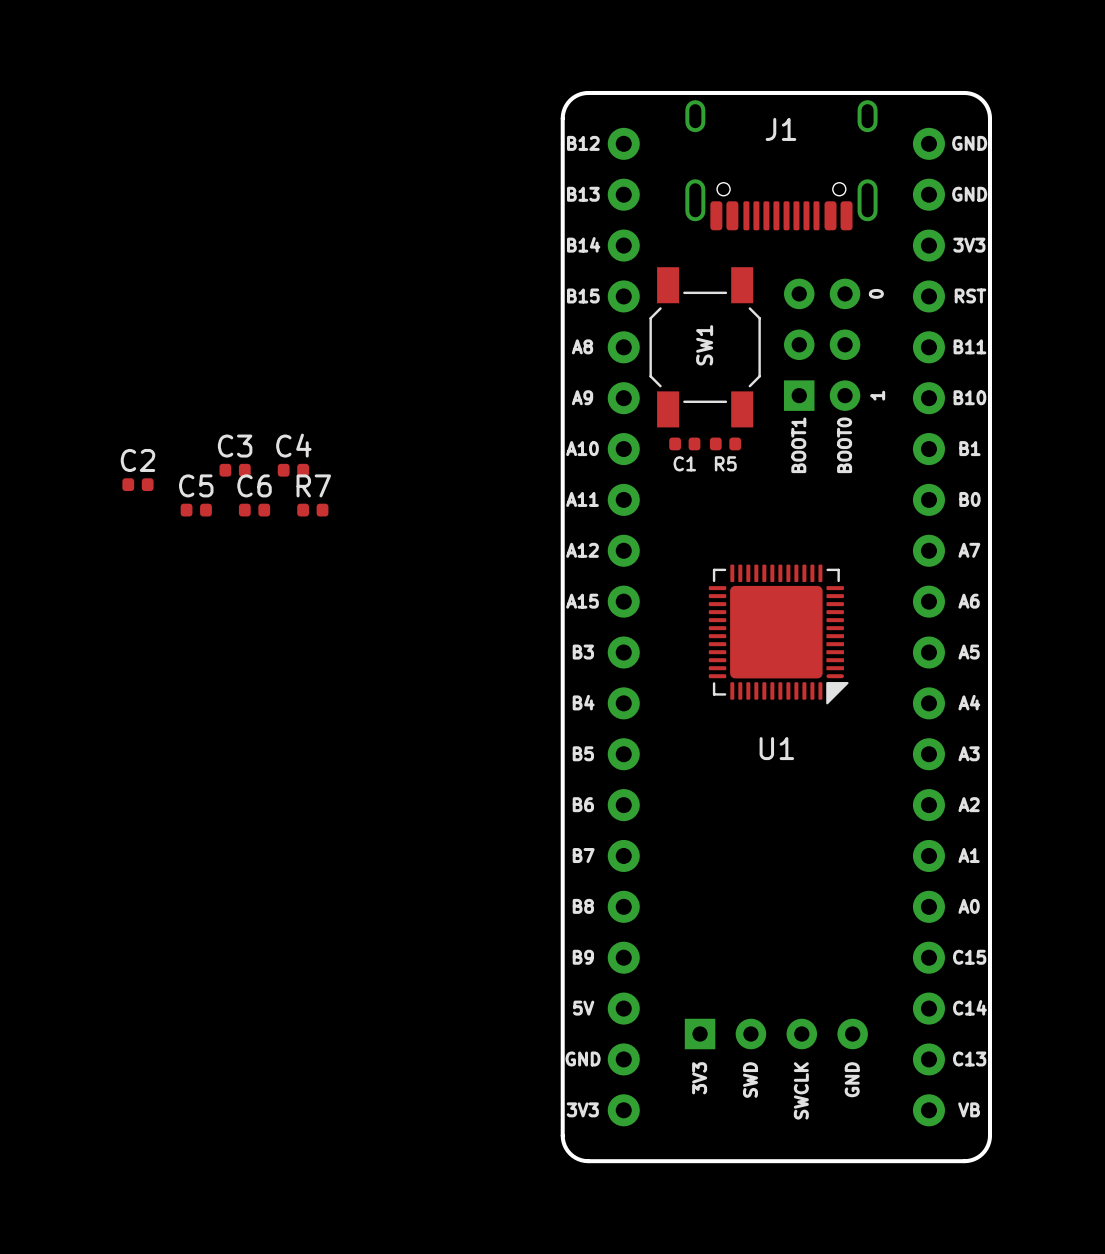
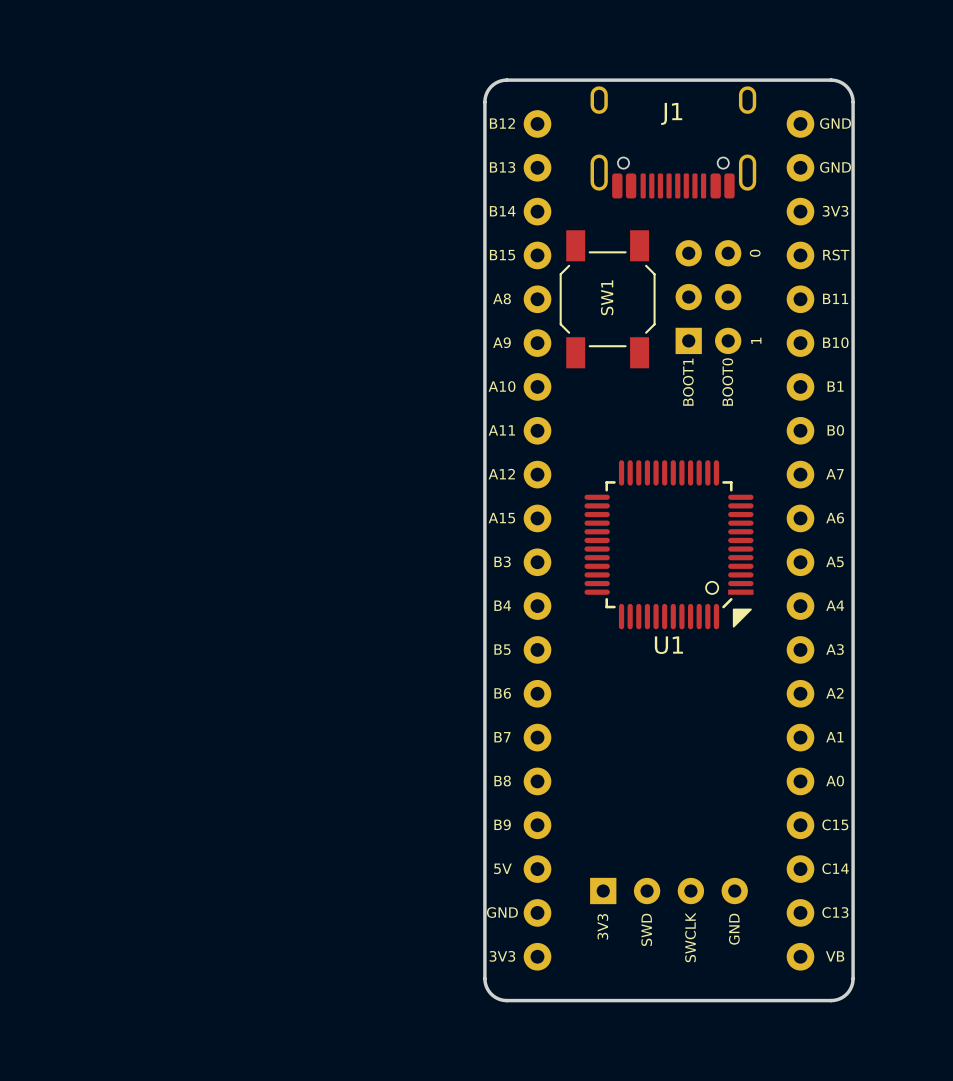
C1: (684, 443) -> none
R5: (725, 443) -> none
C3: (235, 470) -> none
C4: (293, 470) -> none
C2: (137, 484) -> none
C5: (196, 510) -> none
C6: (254, 510) -> none
R7: (312, 510) -> none
U1 footprint: [708, 564, 849, 705] -> [584, 460, 754, 630]

